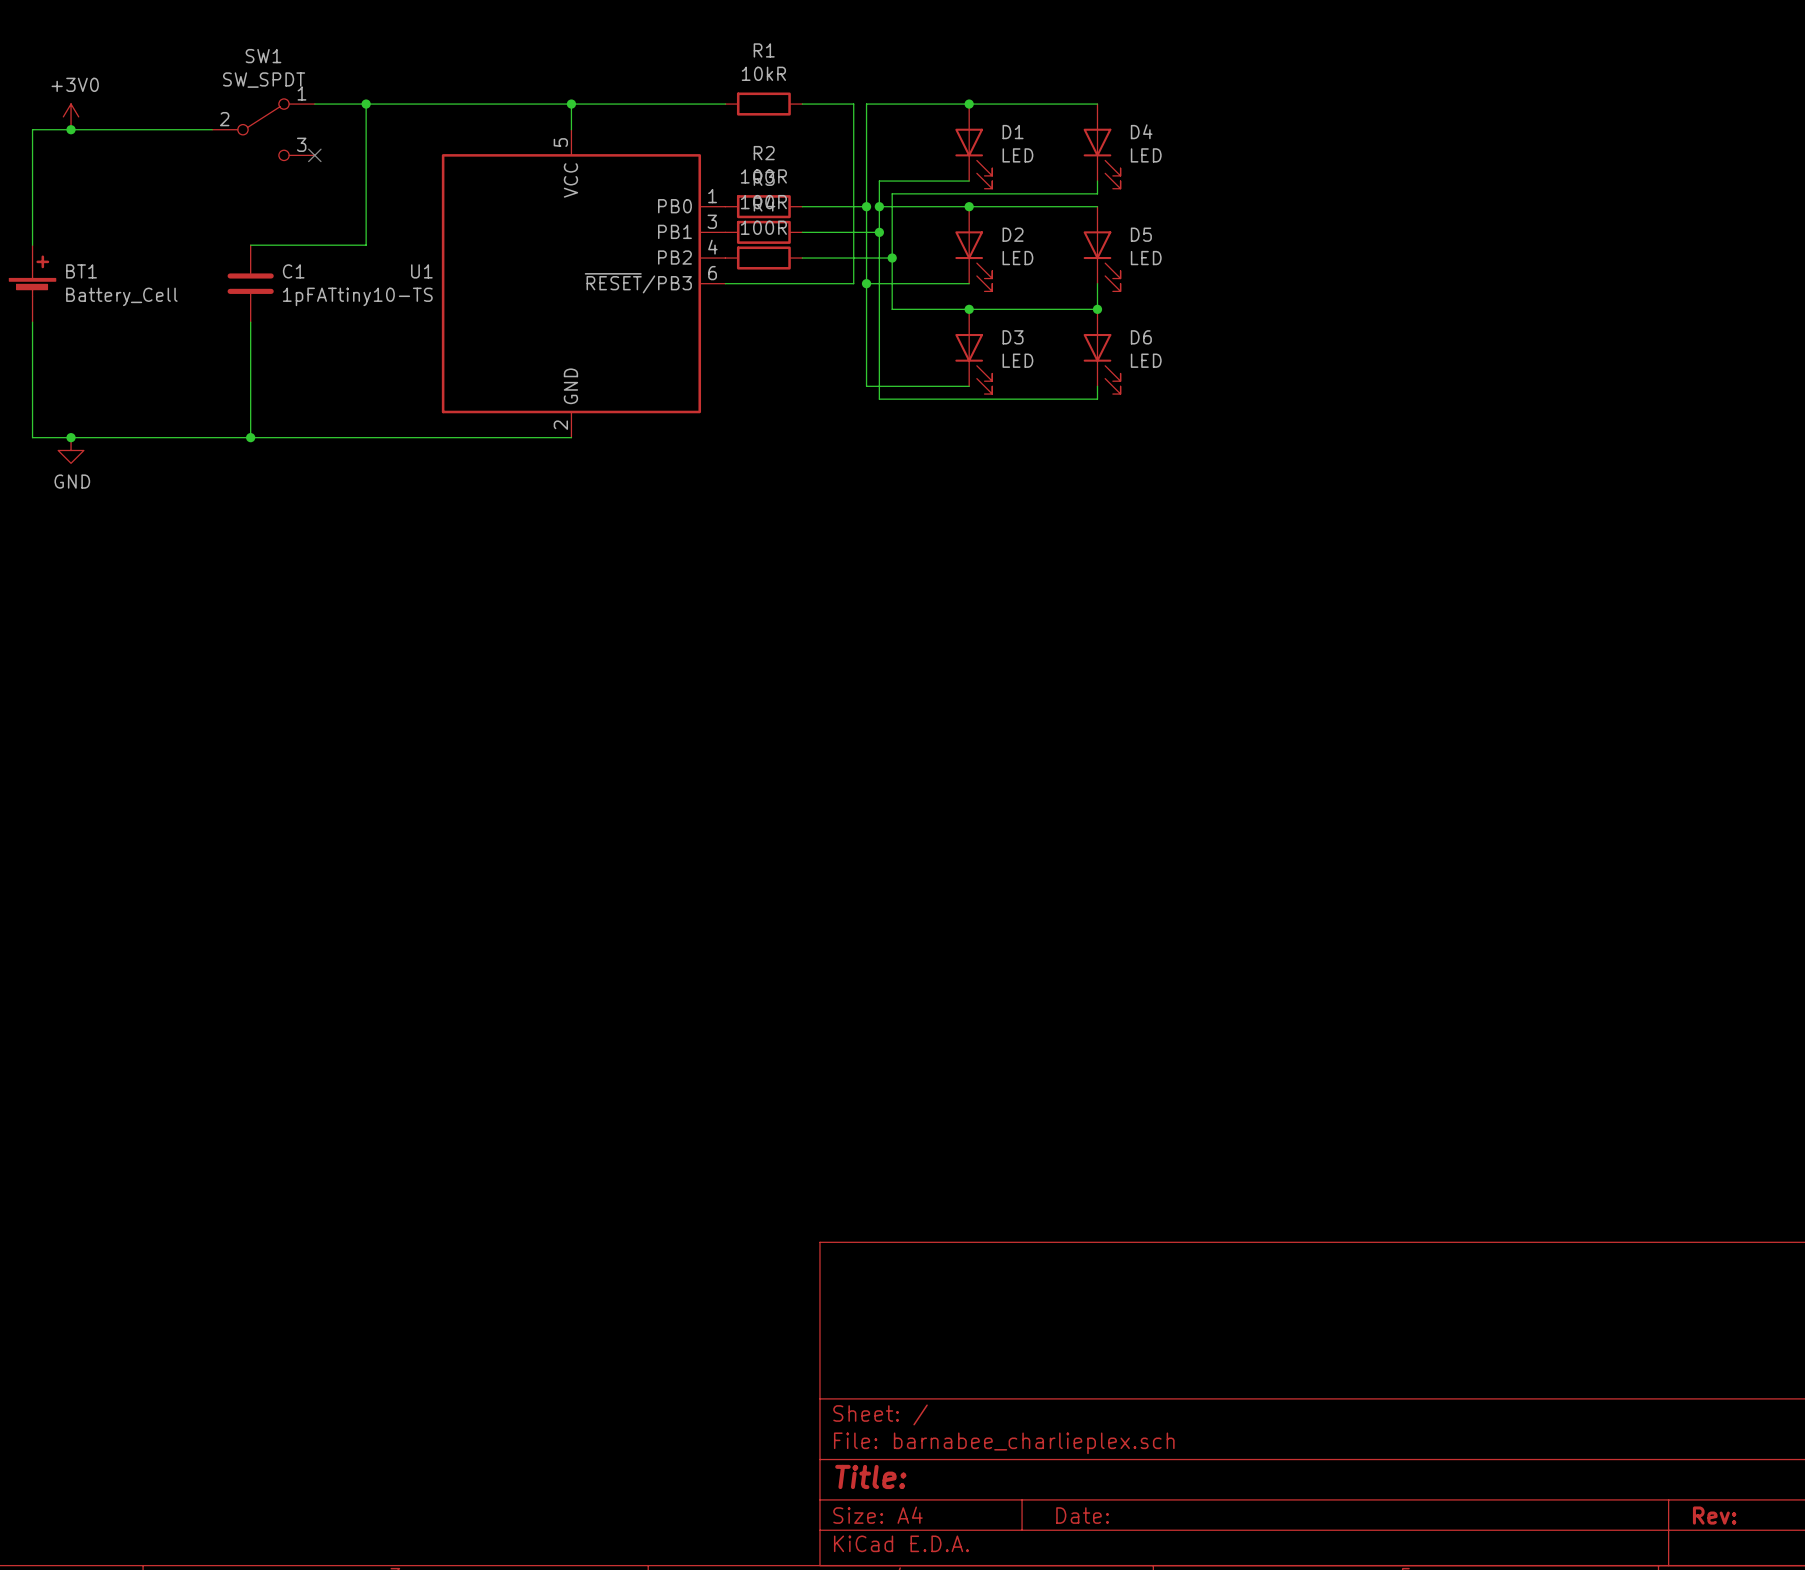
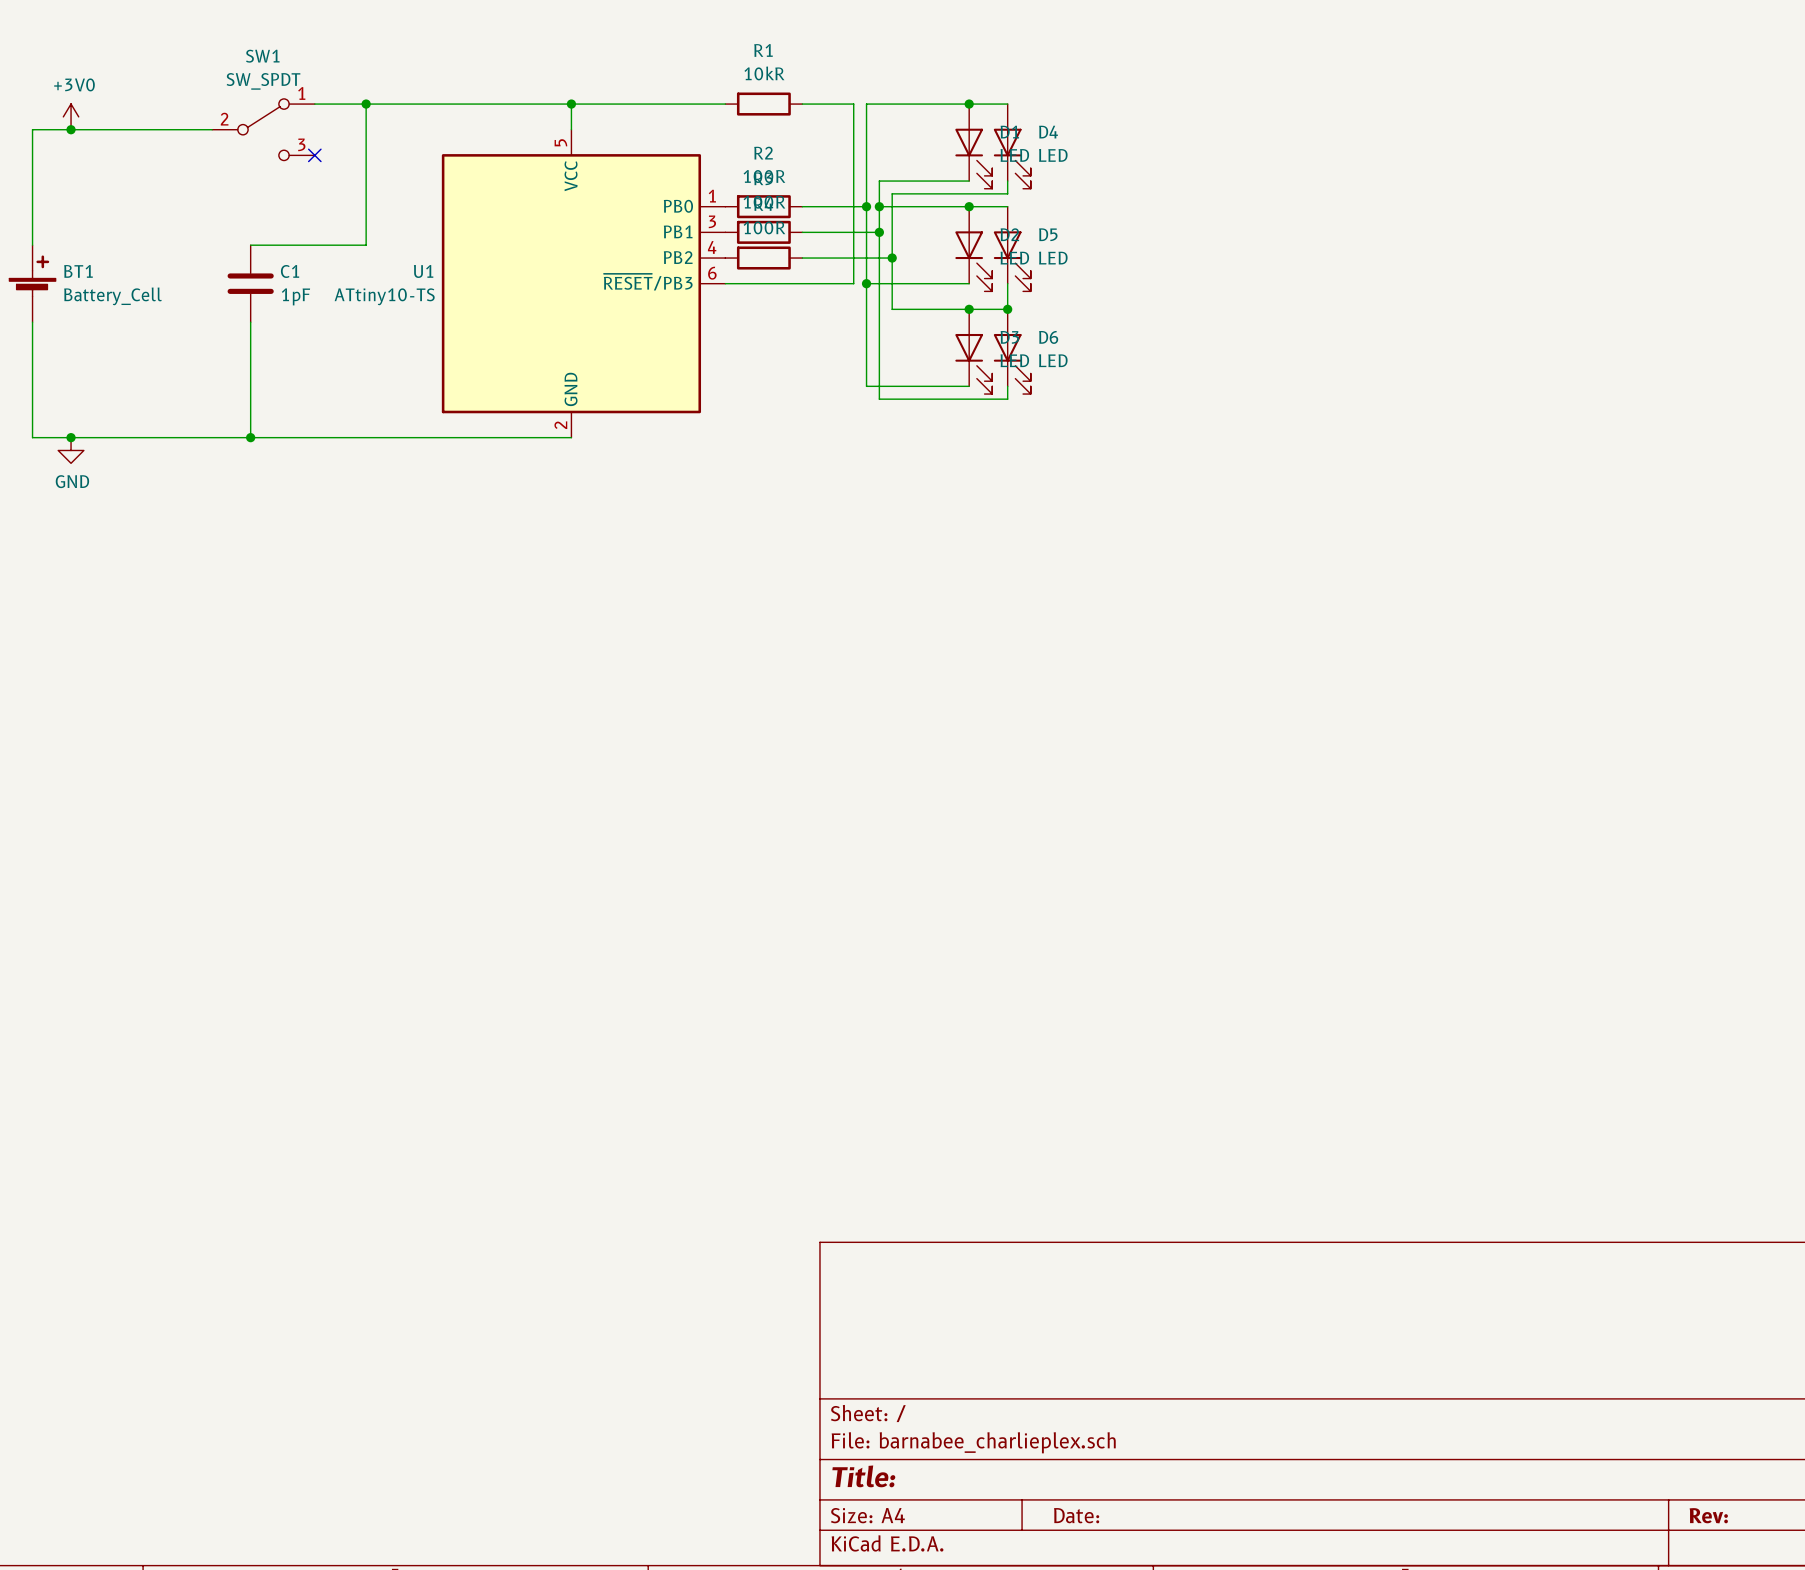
wire: (1007, 104) (1097, 104) -> none
D4 position: (1102, 146) -> (1012, 146)
wire: (1097, 181) (1097, 193) (1007, 193) -> (1007, 181) (1007, 193)
wire: (1007, 206) (1097, 206) -> none
D5 position: (1102, 249) -> (1012, 249)
wire: (1097, 283) (1097, 309) (1007, 309) -> (1007, 283) (1007, 309)
junction: none -> (1007, 309)
junction: (1097, 309) -> none
D6 position: (1102, 351) -> (1012, 351)
wire: (1097, 386) (1097, 399) (1007, 399) -> (1007, 386) (1007, 399)

